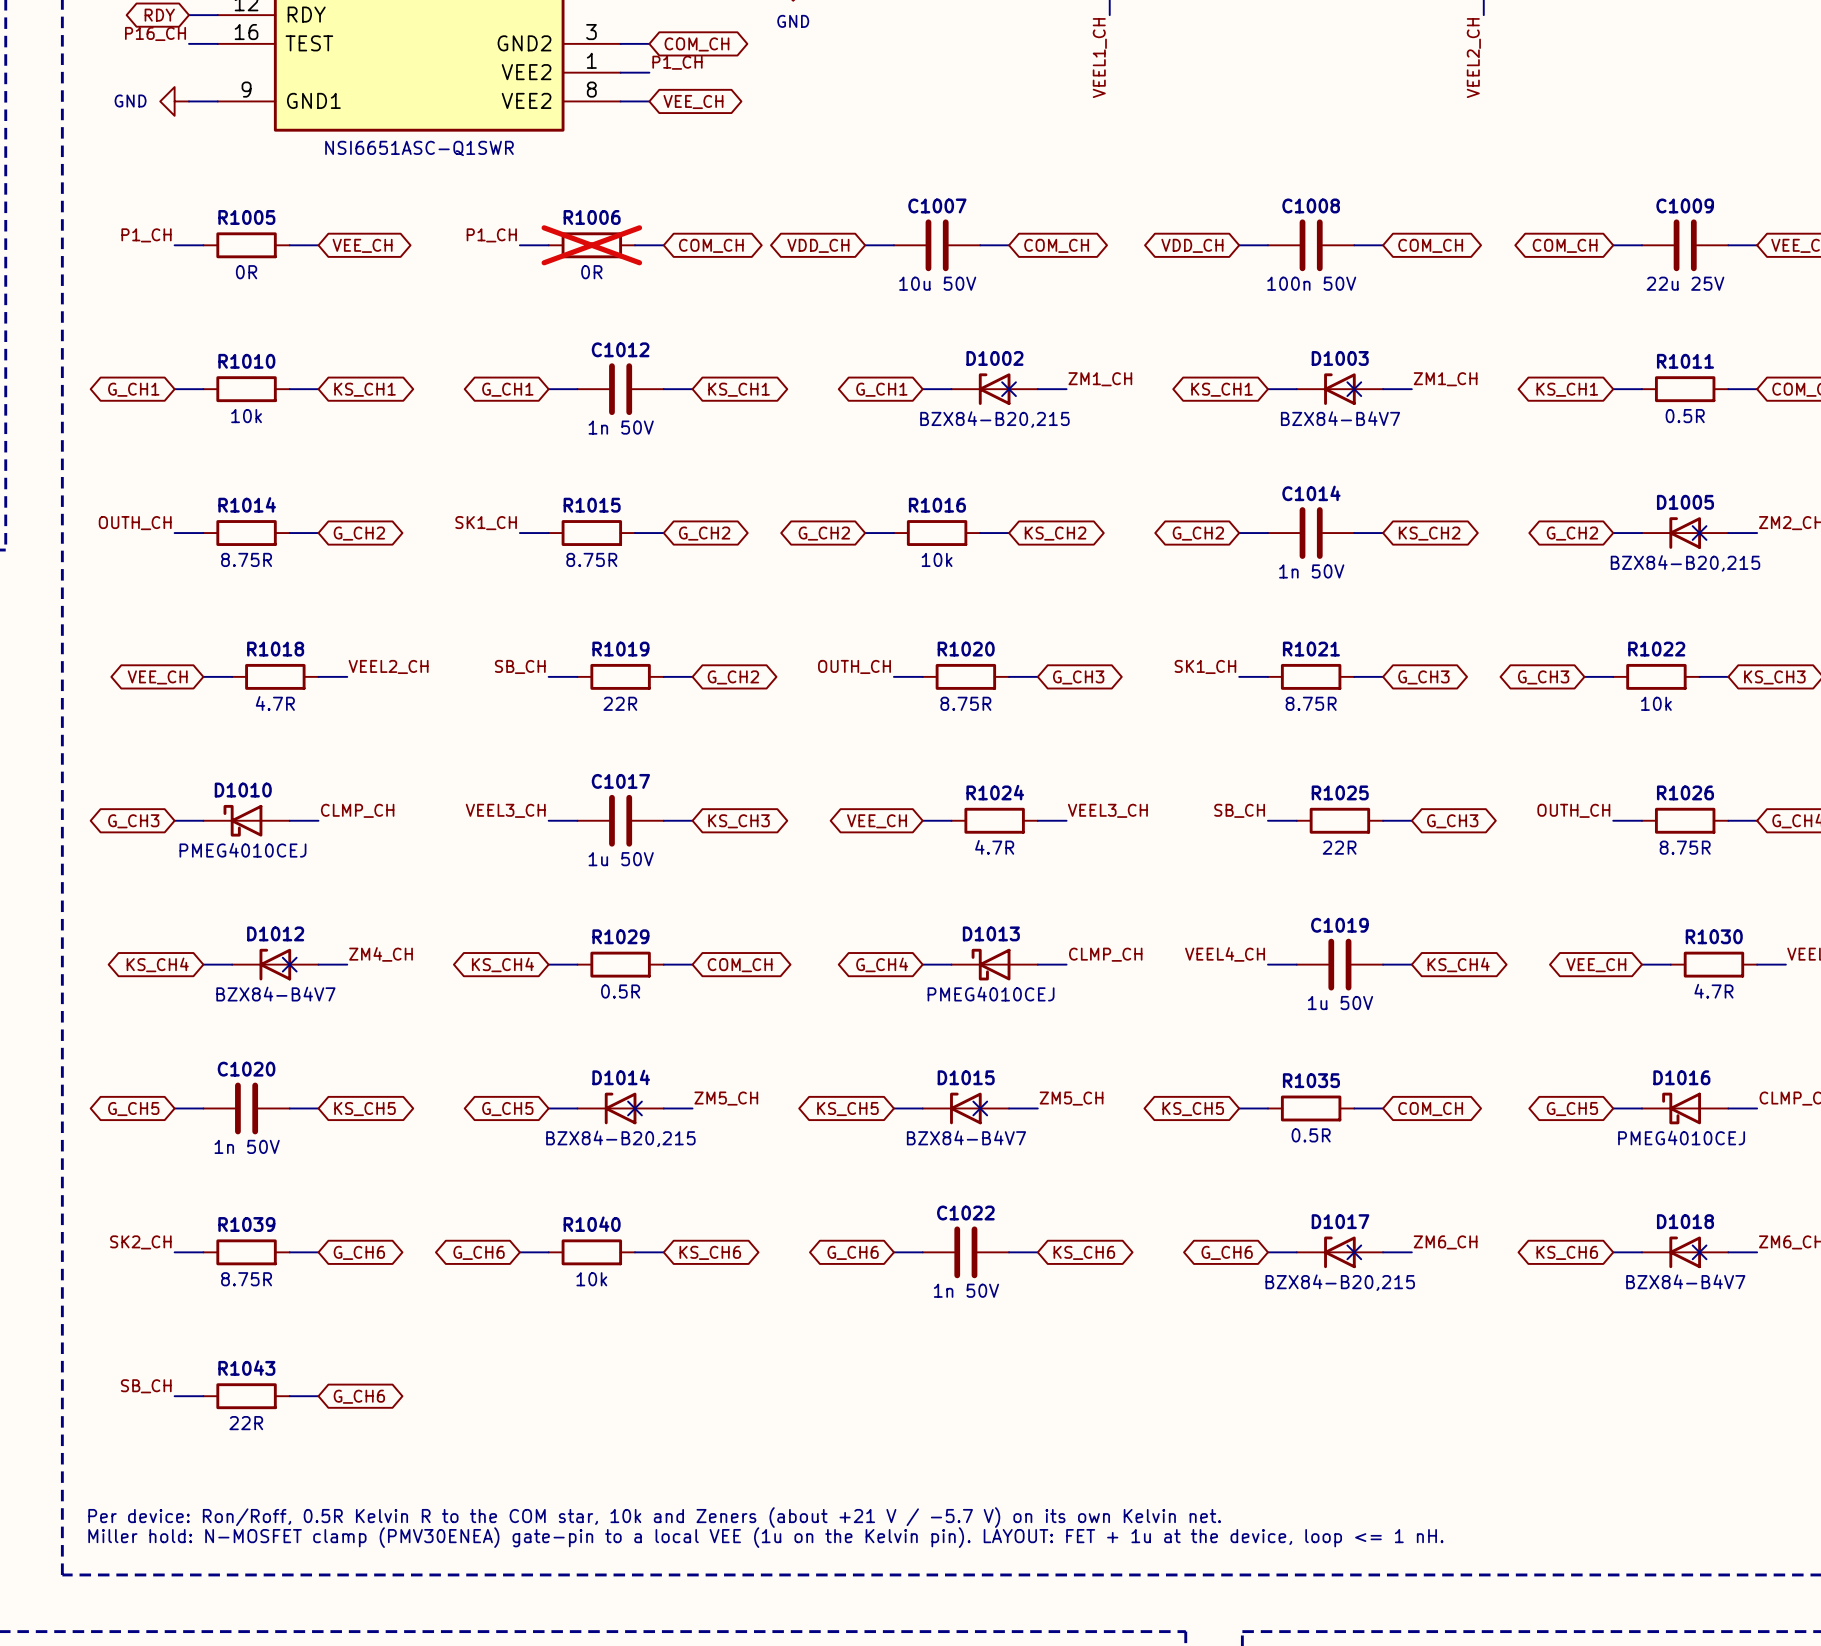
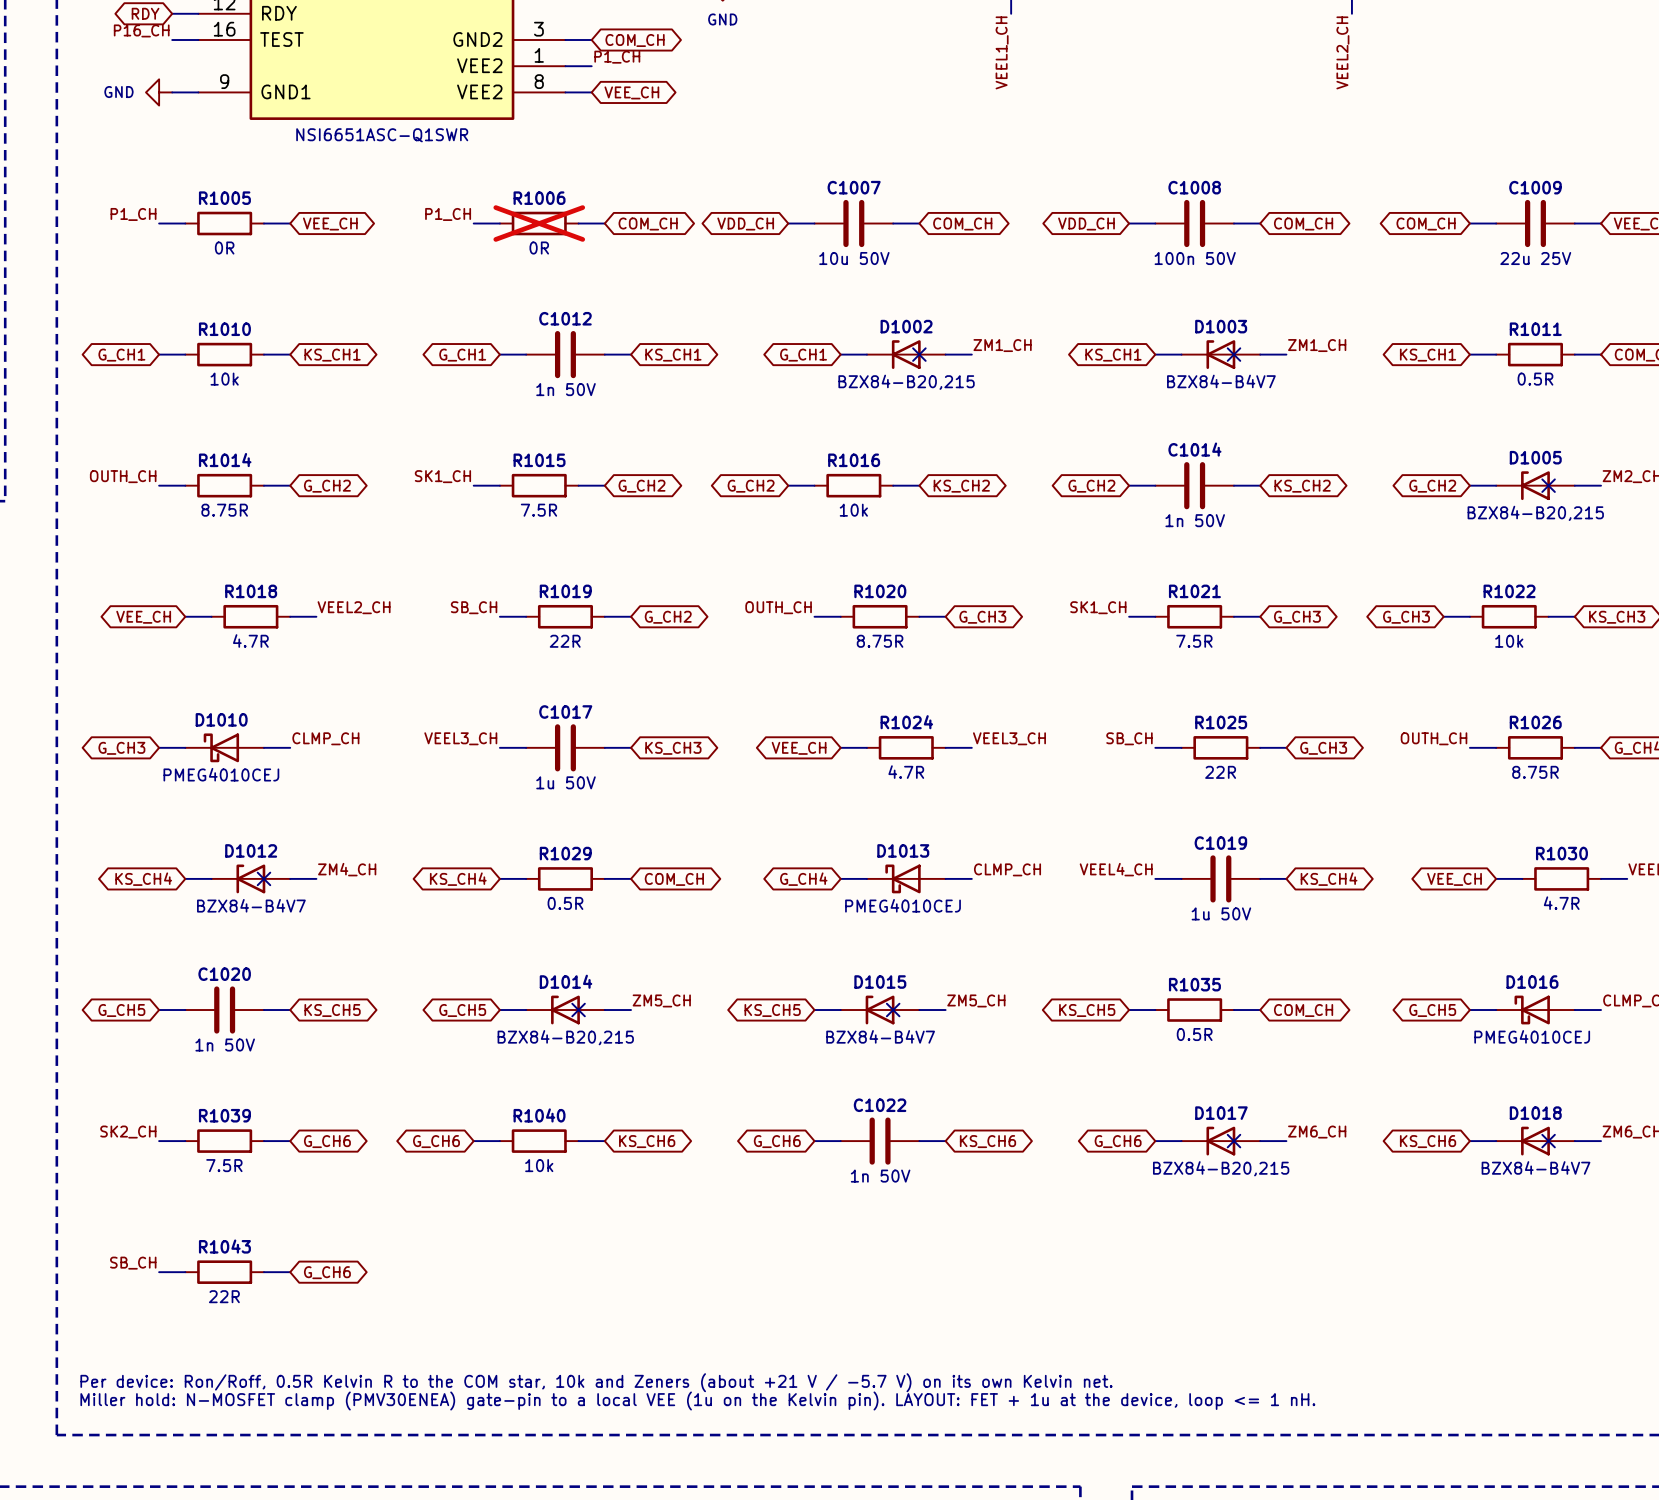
R1015 value: 8.75R (591, 559) -> 7.5R (538, 510)
R1021 value: 8.75R (1311, 703) -> 7.5R (1194, 641)
R1039 value: 8.75R (246, 1279) -> 7.5R (224, 1165)

